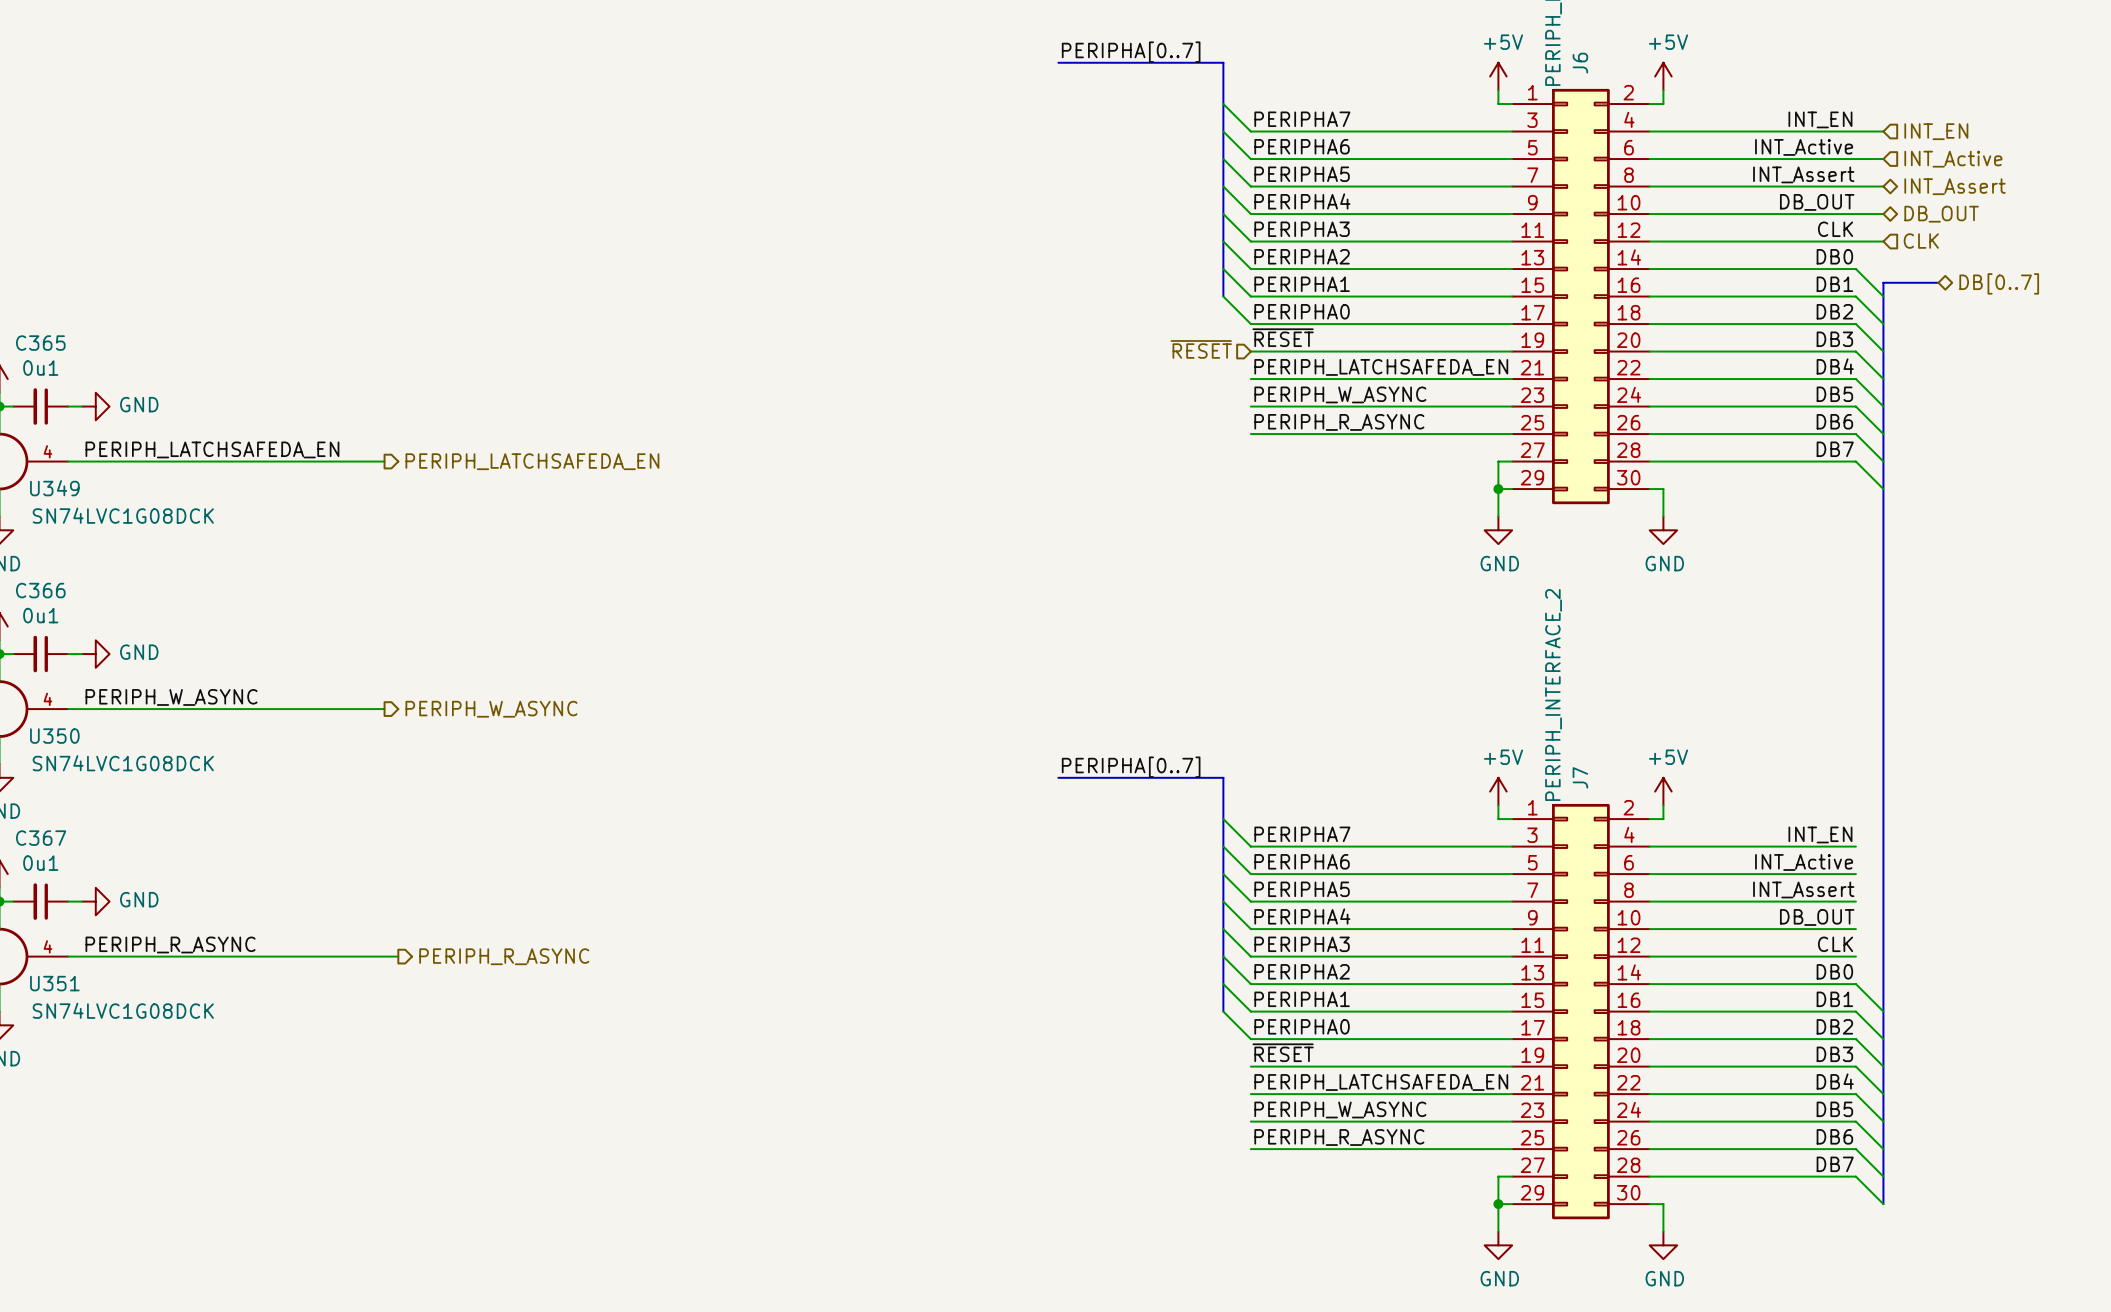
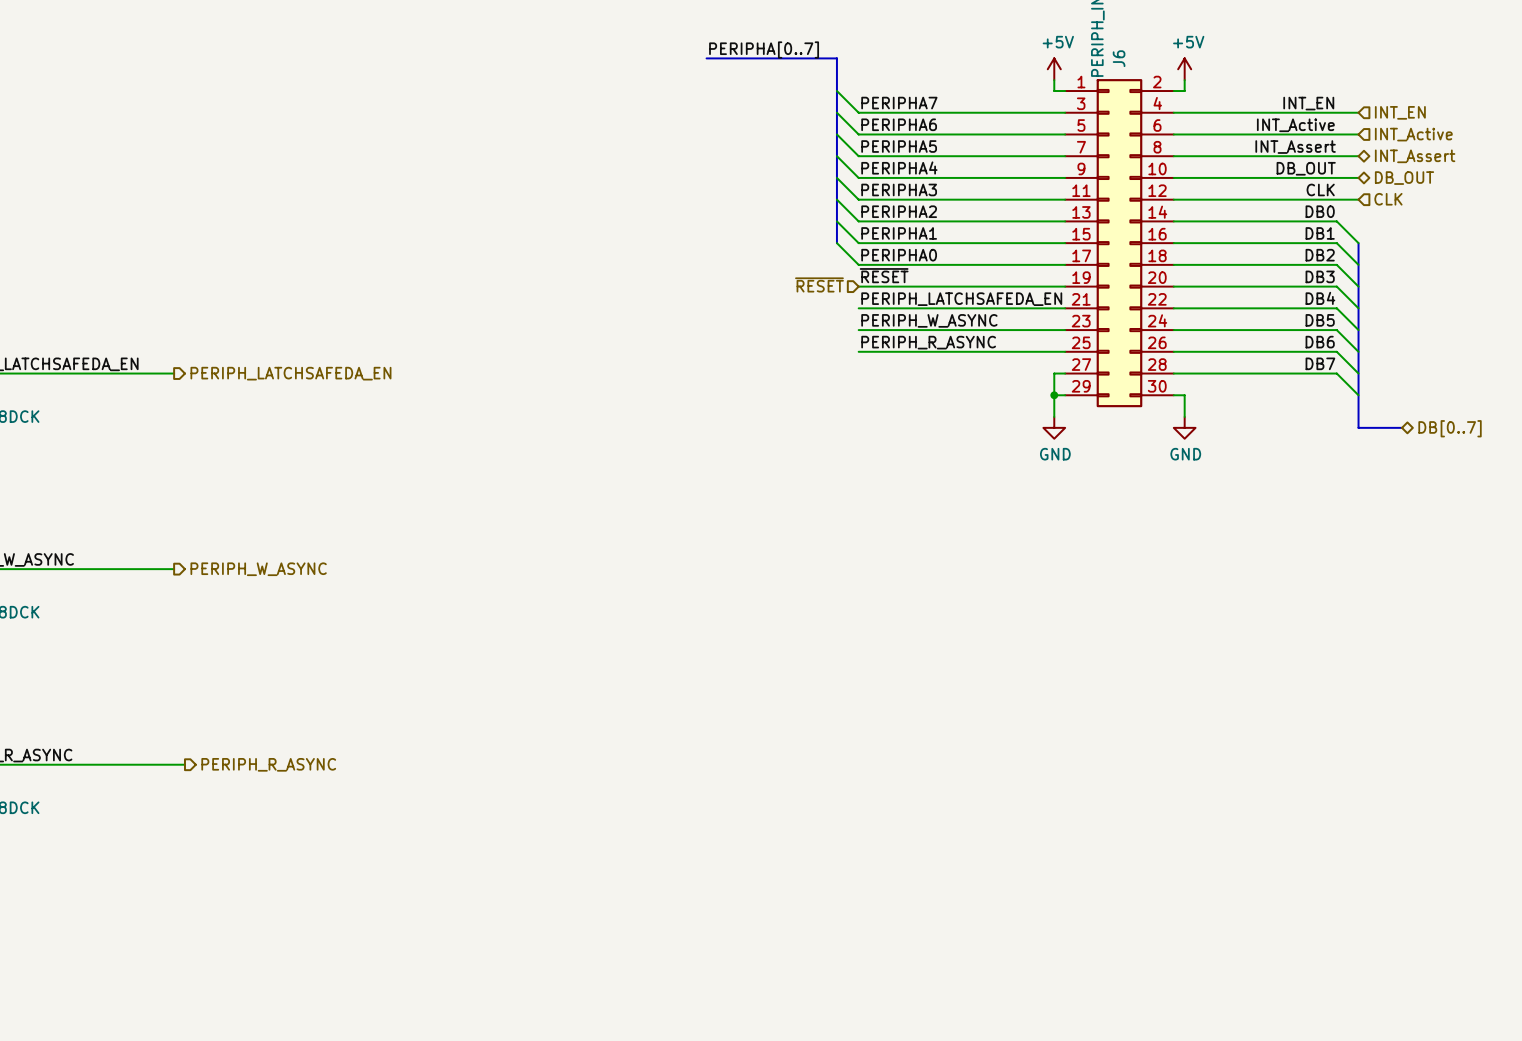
bus: (1938, 282) (1883, 282) (1883, 296) -> none
hierarchical label position: DB[0..7] (1999, 283) -> DB[0..7] (1450, 428)
bus: (1883, 530) (1883, 1204) -> (1358, 427) (1402, 427)
label: PERIPHA[0..7] (1131, 767) -> none
bus: (1058, 777) (1223, 777) (1223, 1011) -> none
power symbol: +5V (1498, 791) -> none
power symbol: +5V (1663, 791) -> none
wire: (1498, 805) (1498, 819) (1512, 819) -> none
wire: (1663, 805) (1663, 819) (1649, 819) -> none
wire: (1223, 819) (1250, 846) (1512, 846) -> none
label: PERIPHA7 (1302, 834) -> none
label: INT_EN (1820, 834) -> none
wire: (1223, 846) (1250, 874) (1512, 874) -> none
wire: (1649, 846) (1855, 846) -> none
label: PERIPHA6 (1302, 861) -> none
label: INT_Active (1804, 862) -> none
wire: (1223, 874) (1250, 901) (1512, 901) -> none
wire: (1649, 874) (1855, 874) -> none
label: PERIPHA5 (1302, 889) -> none
label: INT_Assert (1803, 889) -> none
wire: (1223, 901) (1250, 929) (1512, 929) -> none
wire: (1649, 901) (1855, 901) -> none
label: PERIPHA4 (1302, 916) -> none
label: DB_OUT (1817, 917) -> none
wire: (1223, 929) (1250, 956) (1512, 956) -> none
wire: (1649, 929) (1855, 929) -> none
label: PERIPHA3 (1302, 944) -> none
label: CLK (1835, 944) -> none
wire: (1223, 956) (1250, 984) (1512, 984) -> none
wire: (1649, 956) (1855, 956) -> none
label: PERIPHA2 (1302, 971) -> none
label: DB0 (1834, 971) -> none
wire: (1223, 984) (1250, 1011) (1512, 1011) -> none
wire: (1649, 984) (1855, 984) (1883, 1011) -> none
label: PERIPHA1 (1302, 999) -> none
label: DB1 (1834, 999) -> none
wire: (1223, 1011) (1250, 1039) (1512, 1039) -> none
J7: PERIPH_INTERFACE_2 (1580, 1011) -> none
wire: (1649, 1011) (1855, 1011) (1883, 1039) -> none
label: PERIPHA0 (1302, 1026) -> none
label: DB2 (1834, 1026) -> none
wire: (1649, 1039) (1855, 1039) (1883, 1066) -> none
label: ~{RESET} (1283, 1052) -> none
label: DB3 (1834, 1054) -> none
wire: (1250, 1066) (1512, 1066) -> none
wire: (1649, 1066) (1855, 1066) (1883, 1094) -> none
label: DB4 (1835, 1081) -> none
label: PERIPH_LATCHSAFEDA_EN (1381, 1082) -> none
wire: (1250, 1094) (1512, 1094) -> none
wire: (1649, 1094) (1855, 1094) (1883, 1121) -> none
label: PERIPH_W_ASYNC (1340, 1109) -> none
label: DB5 (1834, 1109) -> none
wire: (1250, 1121) (1512, 1121) -> none
wire: (1649, 1121) (1855, 1121) (1883, 1149) -> none
label: DB6 (1834, 1136) -> none
label: PERIPH_R_ASYNC (1339, 1137) -> none
wire: (1250, 1149) (1512, 1149) -> none
wire: (1649, 1149) (1855, 1149) (1883, 1176) -> none
label: DB7 (1835, 1164) -> none
wire: (1512, 1176) (1498, 1176) (1498, 1231) -> none
wire: (1649, 1176) (1855, 1176) (1883, 1204) -> none
wire: (1498, 1204) (1512, 1204) -> none
junction: (1498, 1204) -> none
wire: (1649, 1204) (1663, 1204) (1663, 1231) -> none
power symbol: GND (1498, 1245) -> none
power symbol: GND (1663, 1245) -> none

